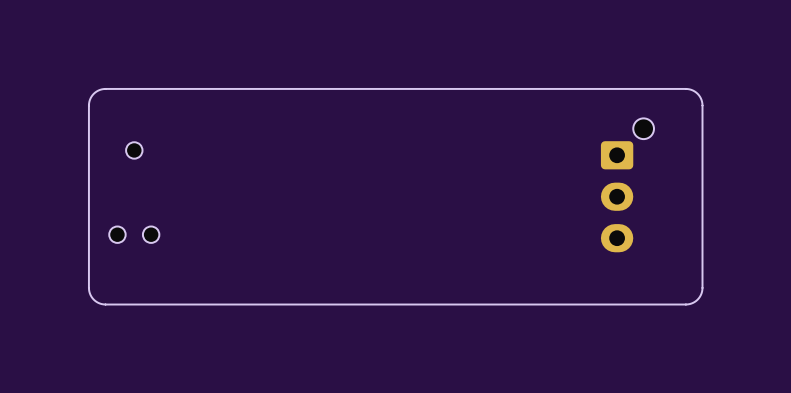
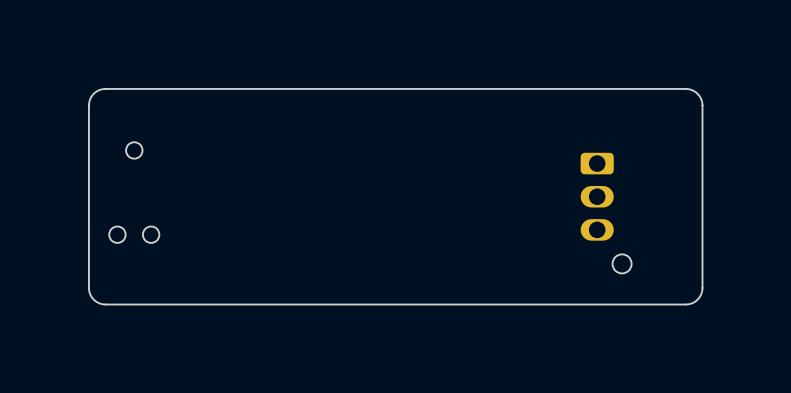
part: (627, 185) -> none
part: none -> (606, 213)

